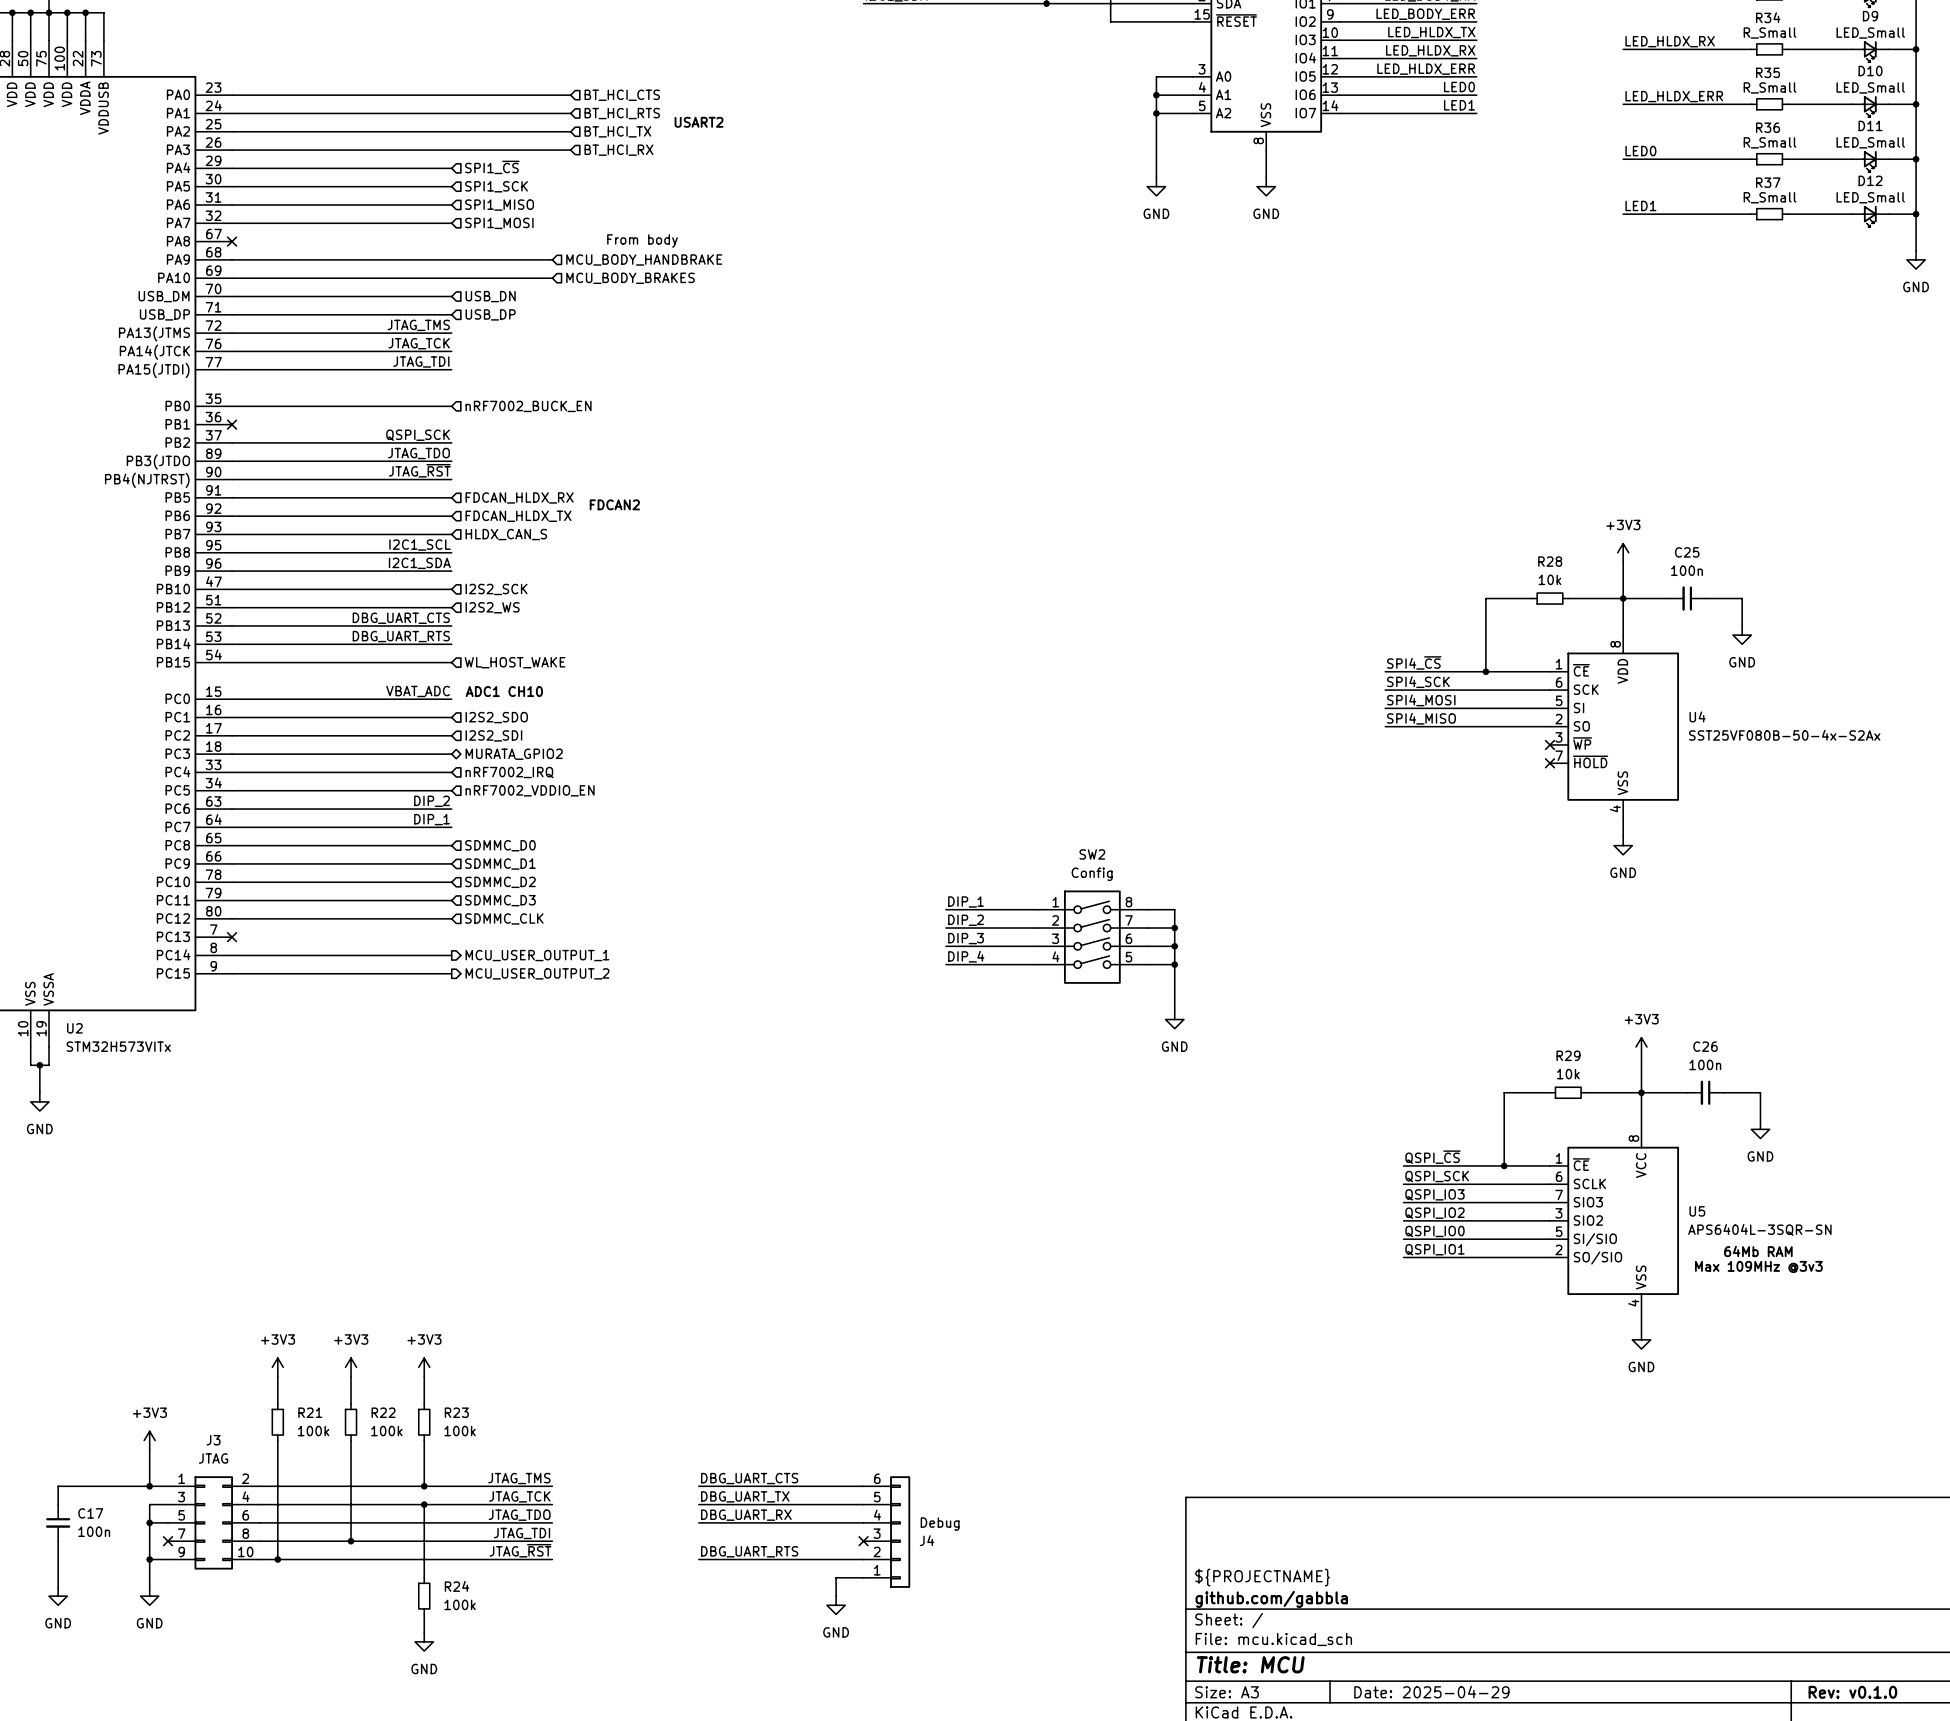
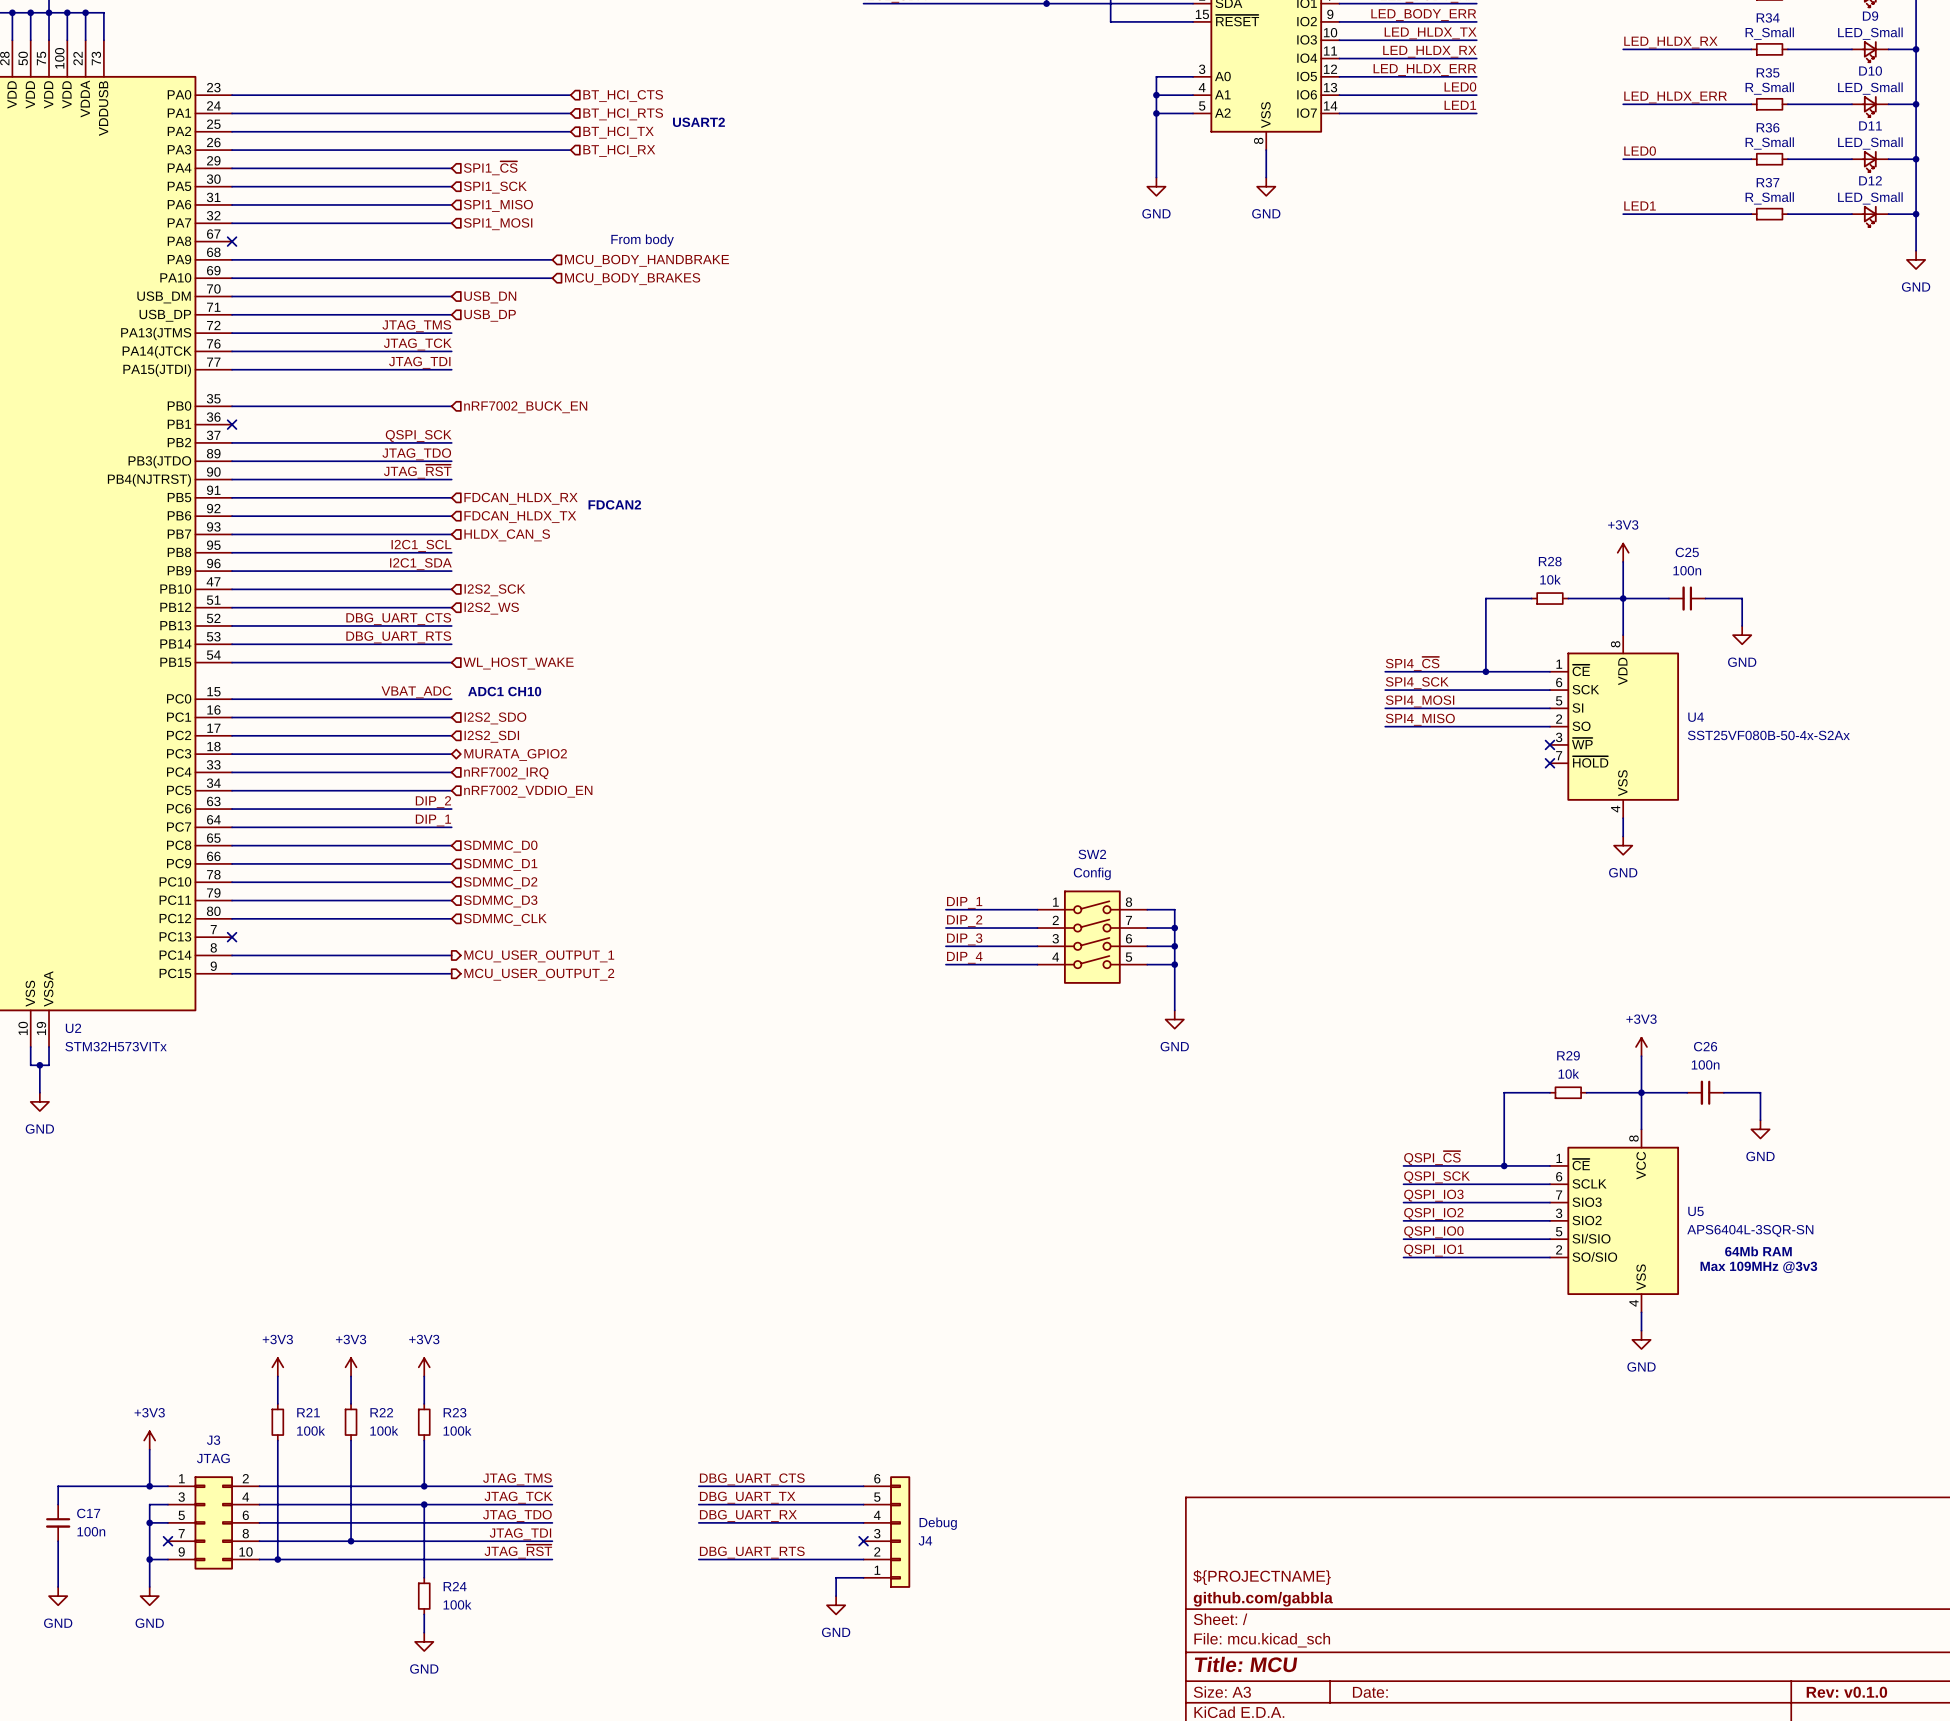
title block: Date: 2025-04-29 (1431, 1692) -> Date: (1370, 1692)

